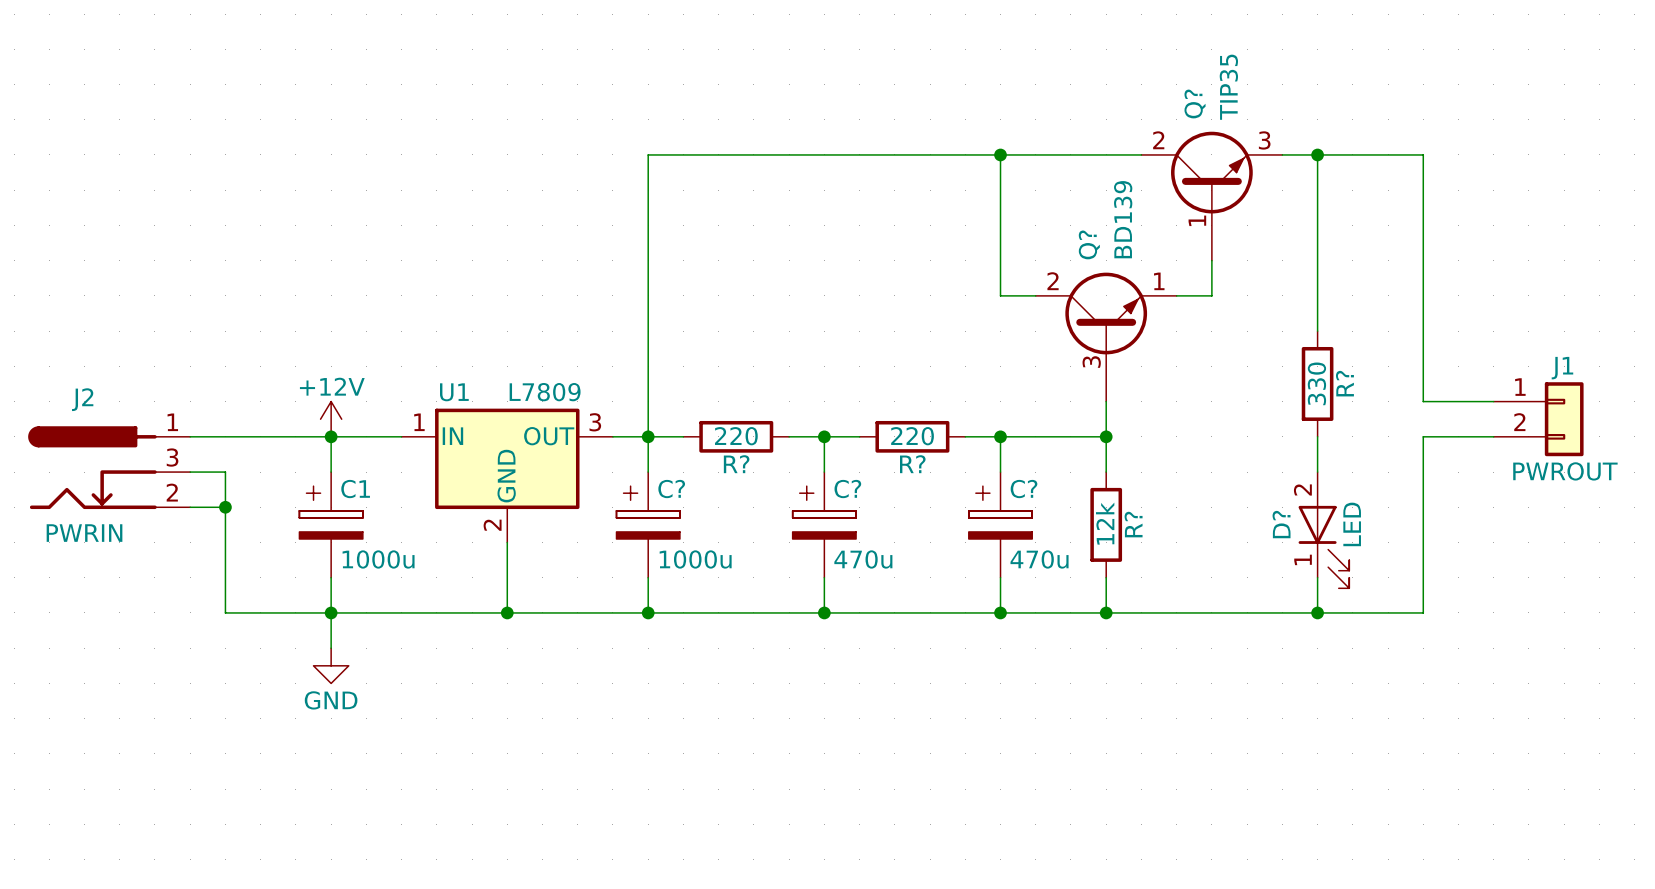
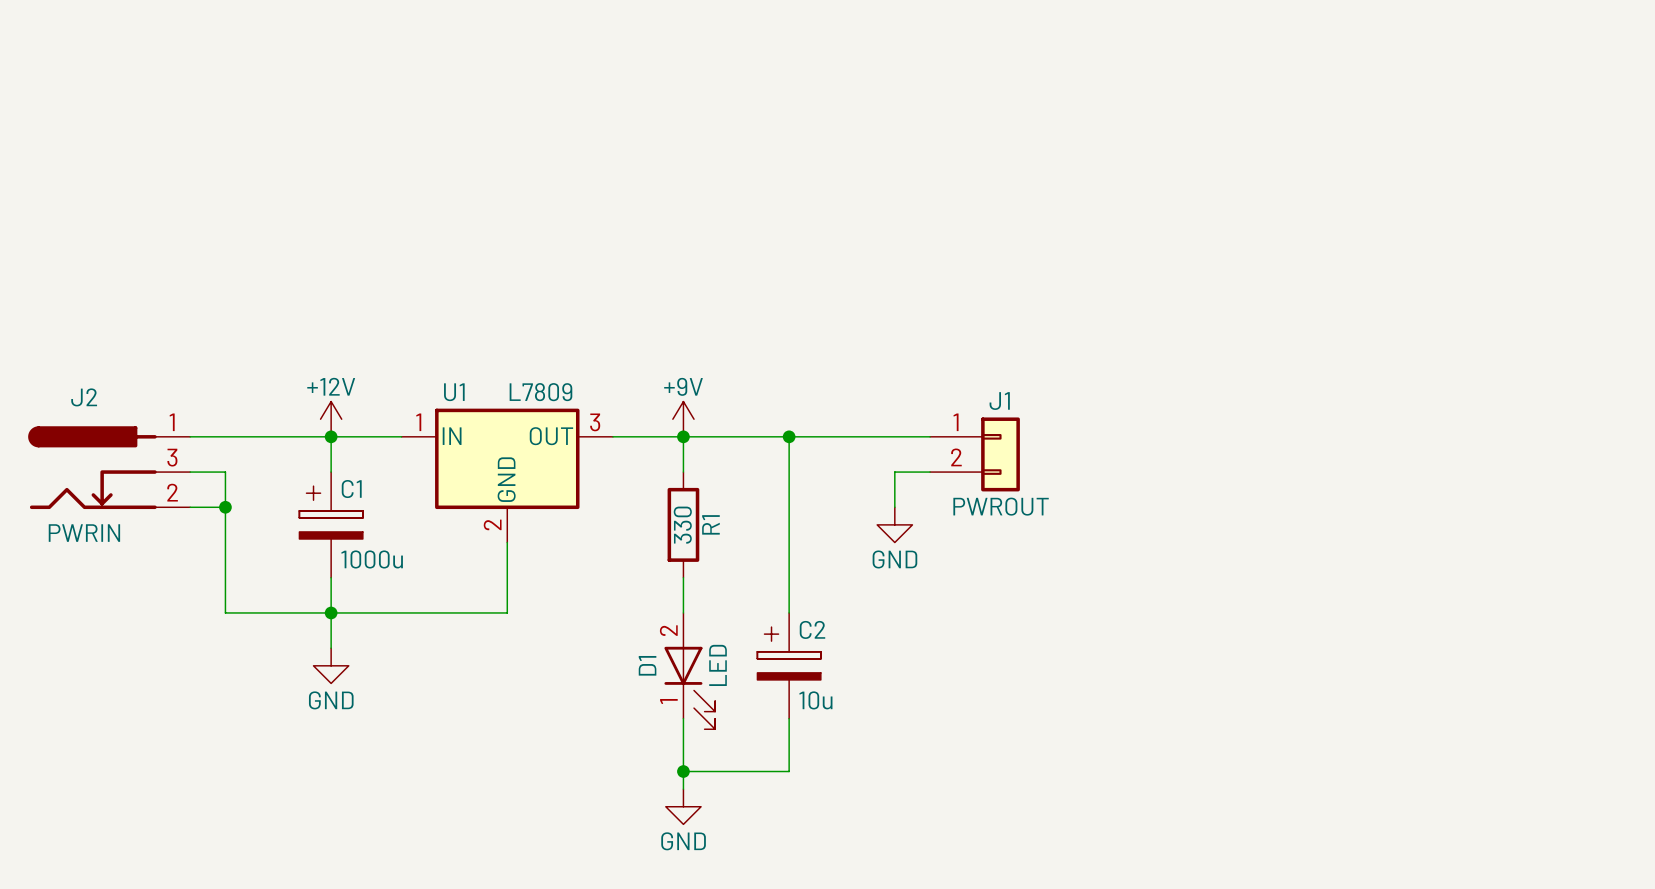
wire: (1000, 154) (1000, 295) (1035, 295) -> none
junction: (1000, 154) -> none
wire: (1141, 154) (648, 154) (648, 472) -> none
wire: (1282, 154) (1423, 154) (1423, 401) (1493, 401) -> none
wire: (1317, 154) (1317, 331) -> none
junction: (1317, 154) -> none
Q?: TIP35 (1211, 196) -> none
wire: (1211, 260) (1211, 295) (1176, 295) -> none
Q?: BD139 (1106, 337) -> none
R?: 330 (1317, 383) -> none
wire: (1106, 401) (1106, 472) -> none
power symbol: none -> +9V (683, 419)
J1 position: (1538, 419) -> (974, 454)
junction position: (648, 436) -> (683, 436)
R?: 220 (736, 436) -> none
wire: (824, 436) (824, 472) -> none
junction position: (824, 436) -> (789, 436)
wire: none -> (859, 436) (930, 436)
R?: 220 (912, 436) -> none
wire: (965, 436) (1106, 436) -> none
junction: (1000, 436) -> none
junction: (1106, 436) -> none
wire: (1317, 436) (1317, 472) -> none
wire: (1493, 436) (1423, 436) (1423, 612) (507, 612) -> none
wire: none -> (683, 472) (683, 436) (789, 436) (789, 612)
wire: none -> (930, 472) (894, 472) (894, 507)
C?: 1000u (648, 524) -> none
R1: none -> 330 (683, 524)
C?: 470u (824, 524) -> none
power symbol: none -> GND (894, 524)
C?: 470u (1000, 524) -> none
R?: 12k (1106, 524) -> none
D?: LED (1323, 530) -> none
wire: (648, 577) (648, 612) -> (683, 577) (683, 612)
wire: (824, 577) (824, 612) -> none
wire: (1000, 577) (1000, 612) -> none
wire: (1106, 577) (1106, 612) -> none
wire: (1317, 577) (1317, 612) -> none
junction: (507, 612) -> none
junction: (648, 612) -> none
junction: (824, 612) -> none
junction: (1000, 612) -> none
junction: (1106, 612) -> none
junction: (1317, 612) -> none
C2: none -> 10u (789, 665)
D1: none -> LED (689, 671)
wire: none -> (683, 718) (683, 789)
wire: none -> (789, 718) (789, 771) (683, 771)
junction: none -> (683, 771)
power symbol: none -> GND (683, 806)

